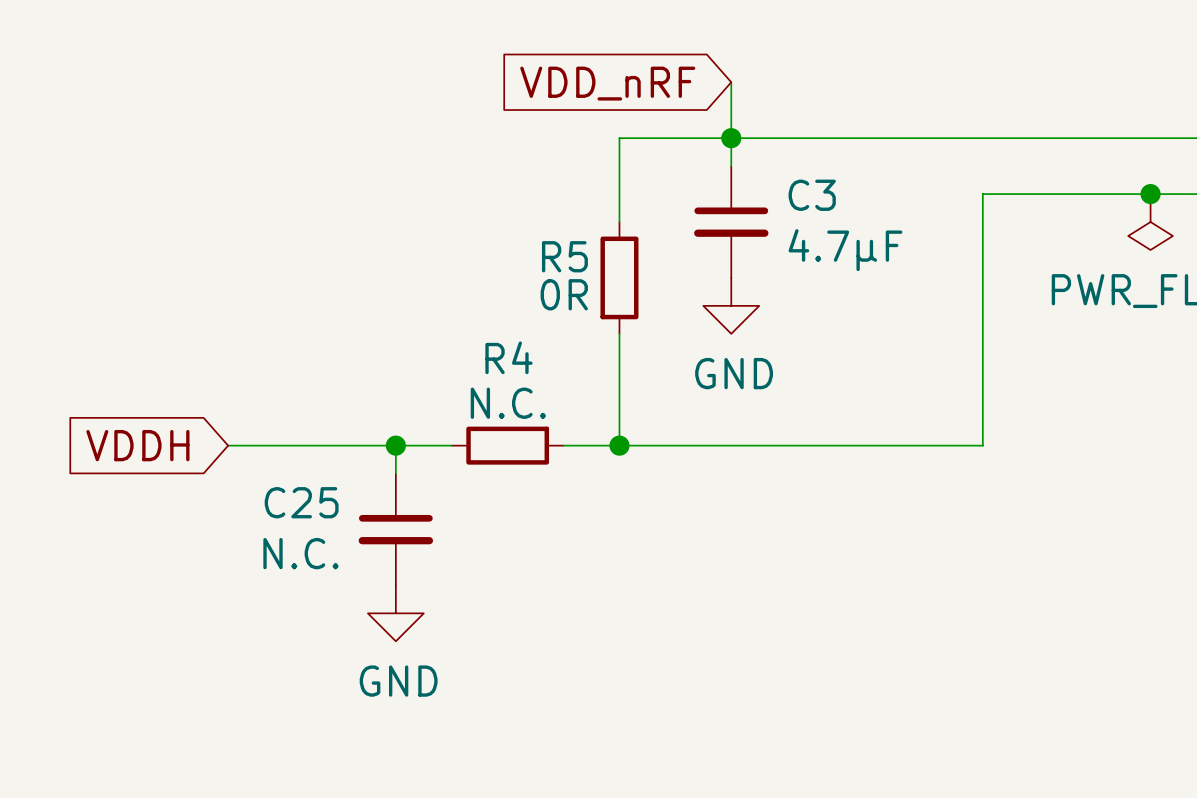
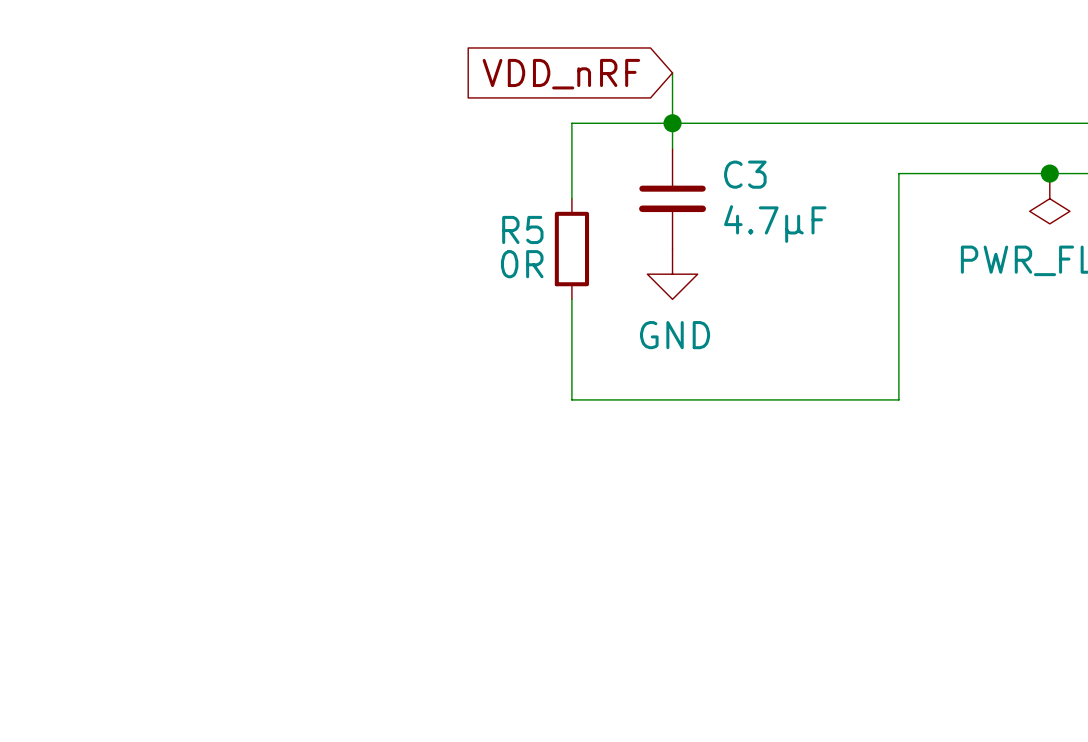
global label: VDDH (137, 445) -> none
wire: (228, 445) (451, 445) -> none
wire: (395, 445) (395, 473) -> none
junction: (395, 445) -> none
R4: N.C. (507, 445) -> none
wire: (563, 445) (619, 445) -> none
junction: (619, 445) -> none
C25: N.C. (395, 529) -> none
power symbol: GND (395, 613) -> none

